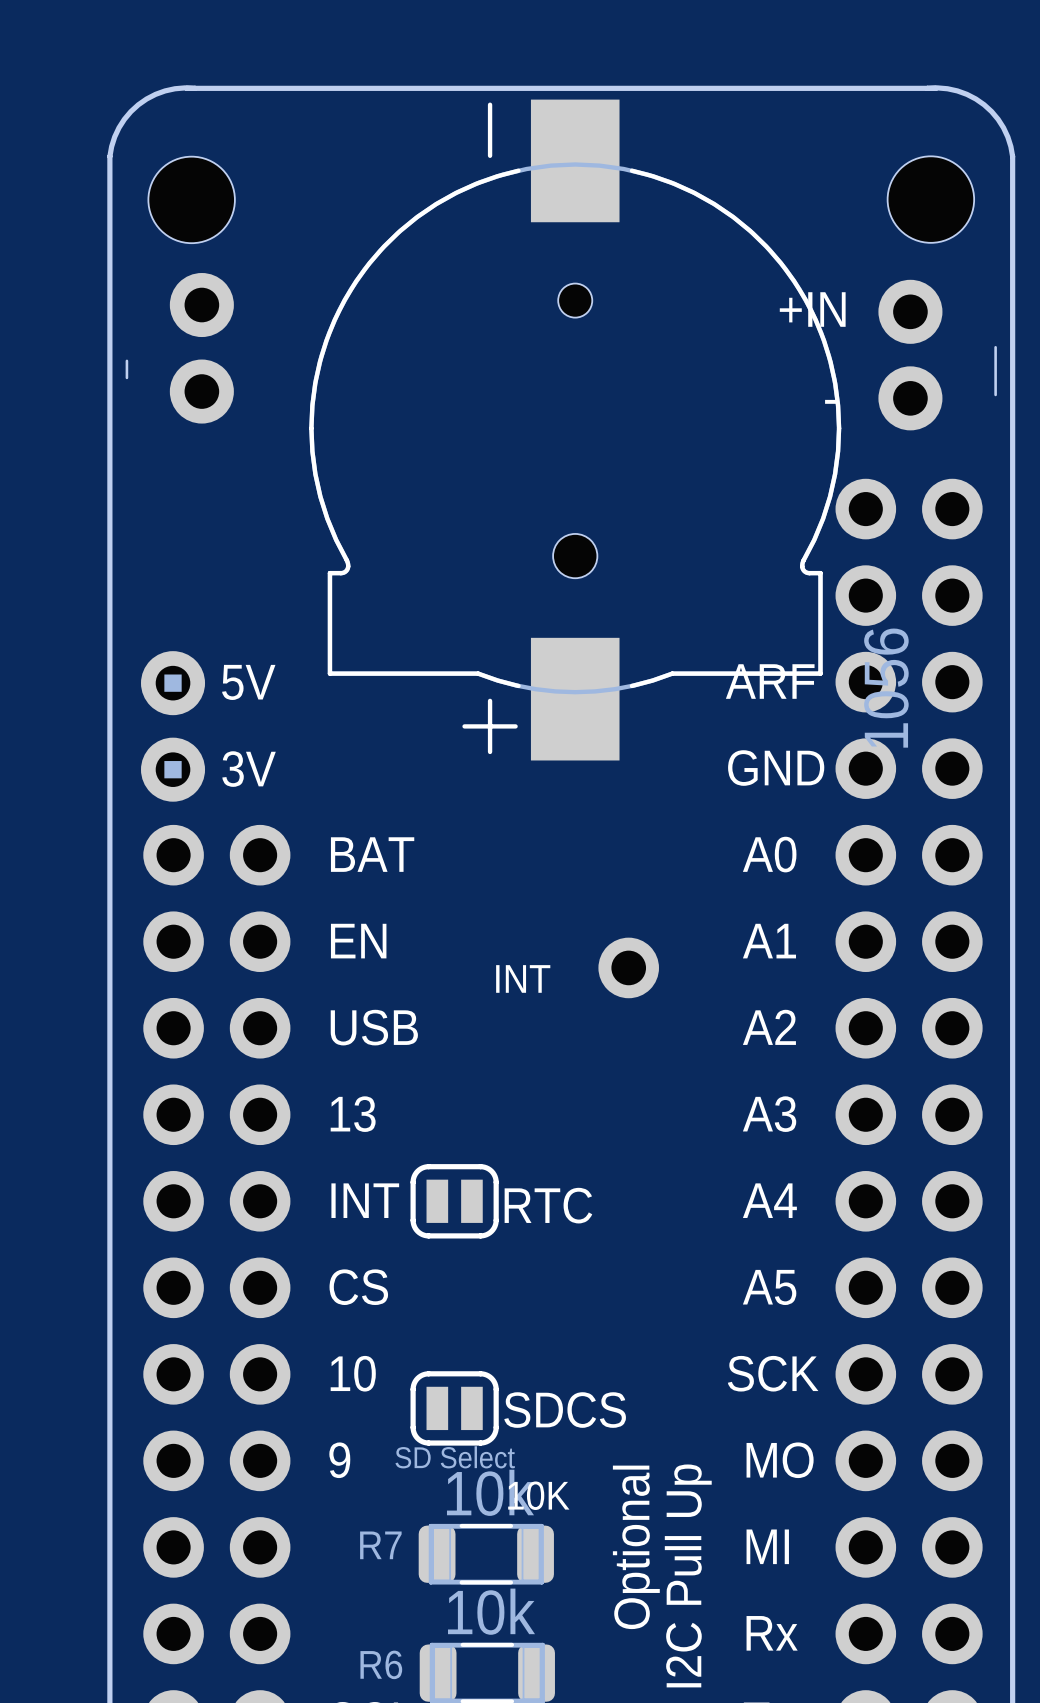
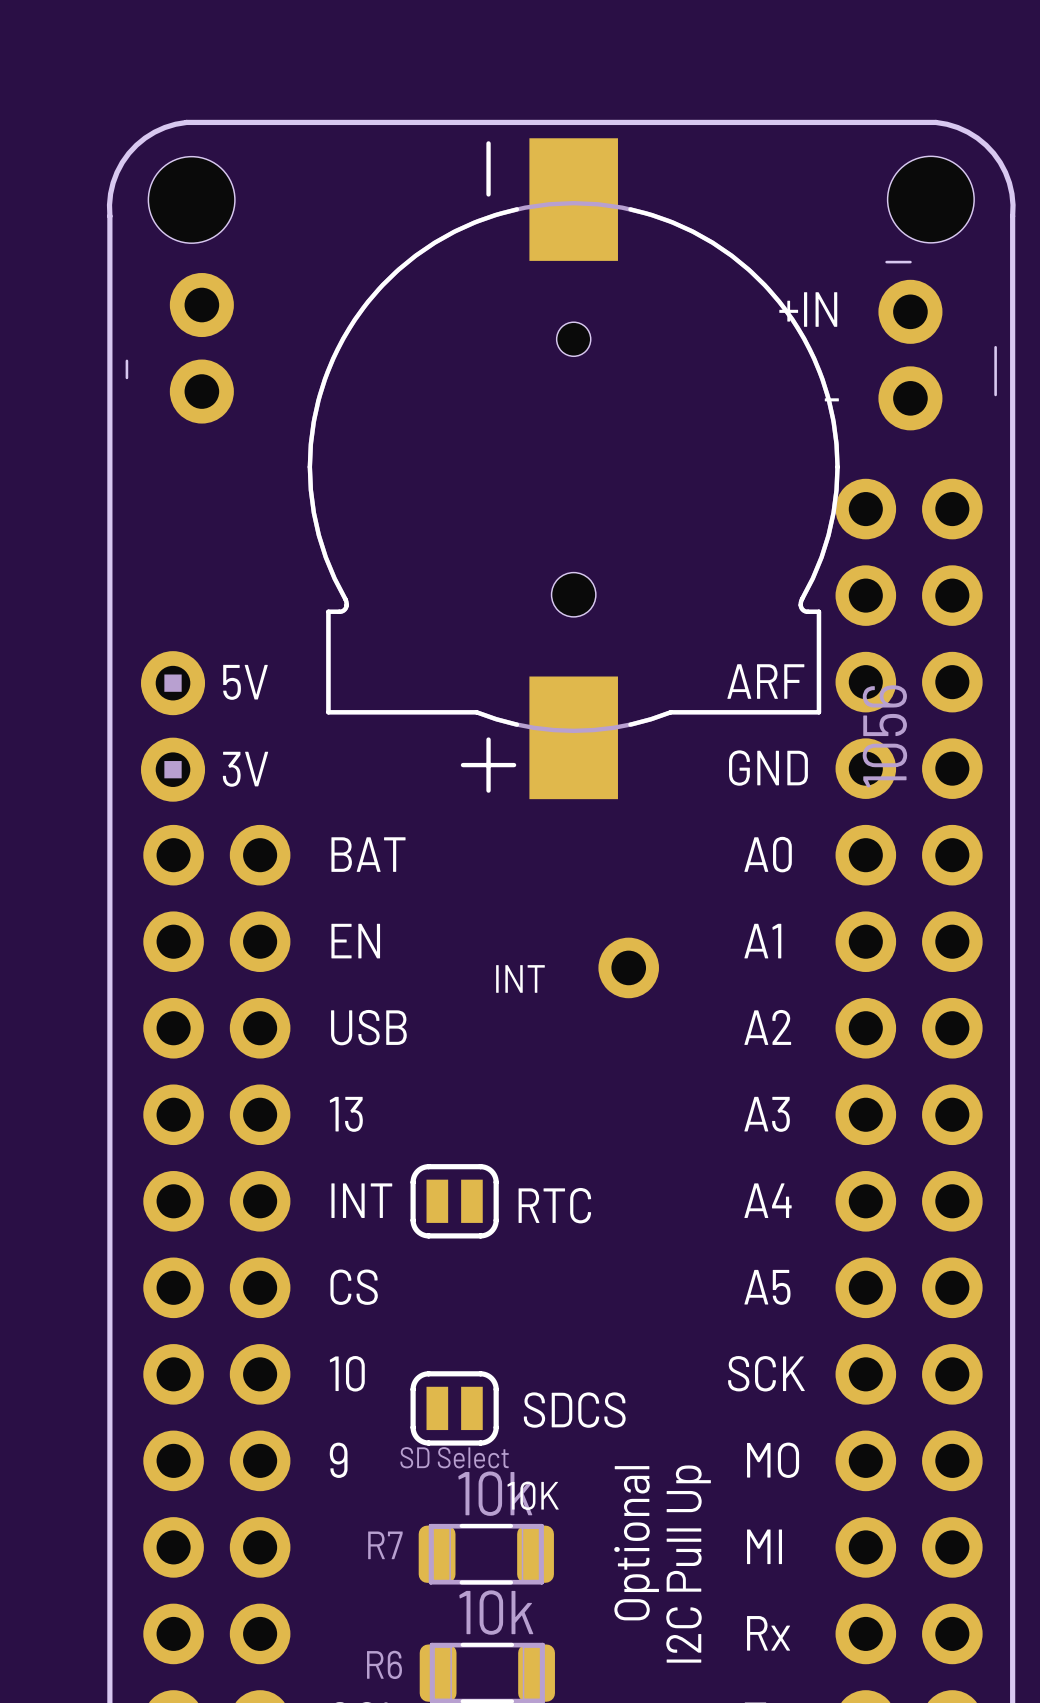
board edge: (195, 88) (174, 88) (155, 94) (138, 104) (124, 119) (114, 136) (109, 156) (109, 216) -> none
board edge: (927, 88) (947, 88) (966, 94) (984, 104) (998, 119) (1007, 136) (1012, 156) (1012, 216) -> (109, 216) (113, 182) (128, 153) (154, 132) (186, 122) (935, 122) (967, 132) (993, 153) (1009, 182) (1012, 216)
board edge: (935, 88) (186, 88) -> none
board edge: none -> (910, 262) (886, 262)
part position: (575, 430) -> (573, 468)

